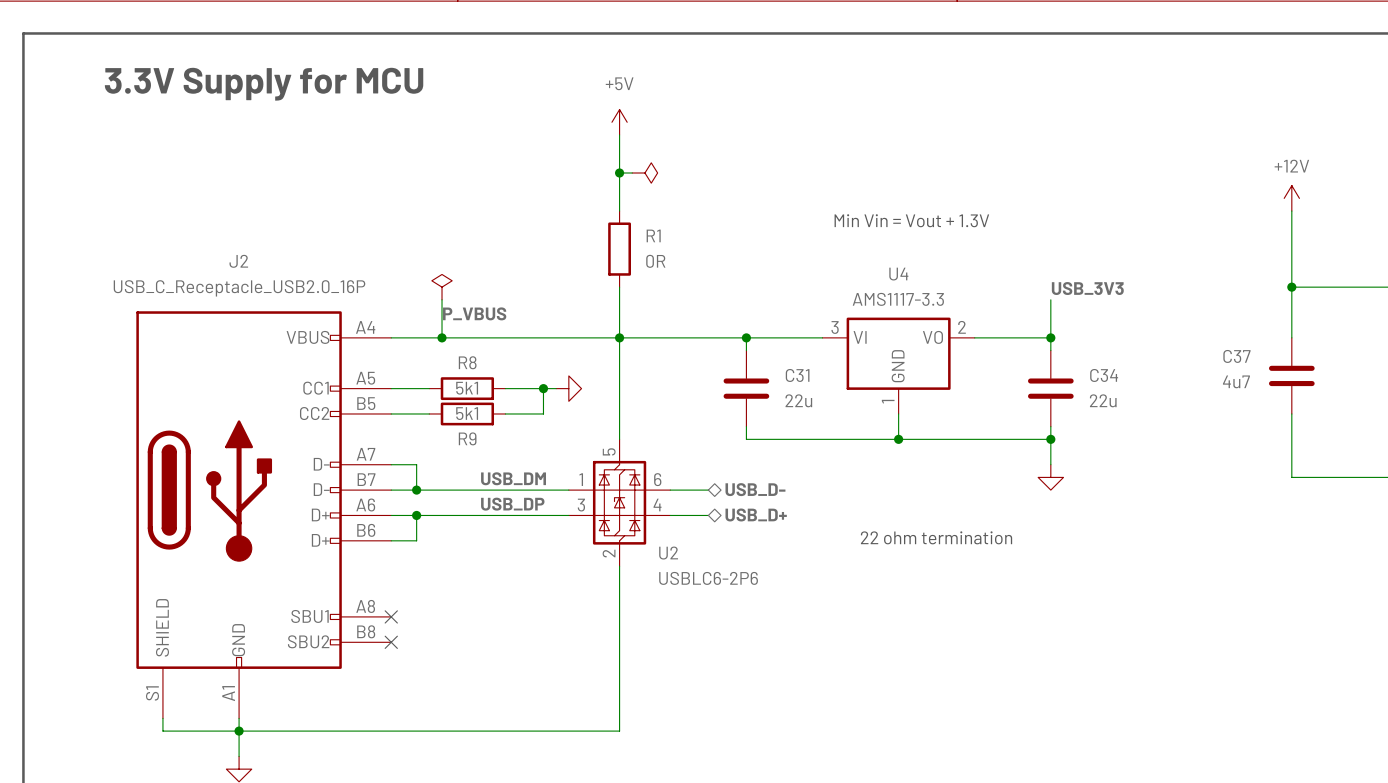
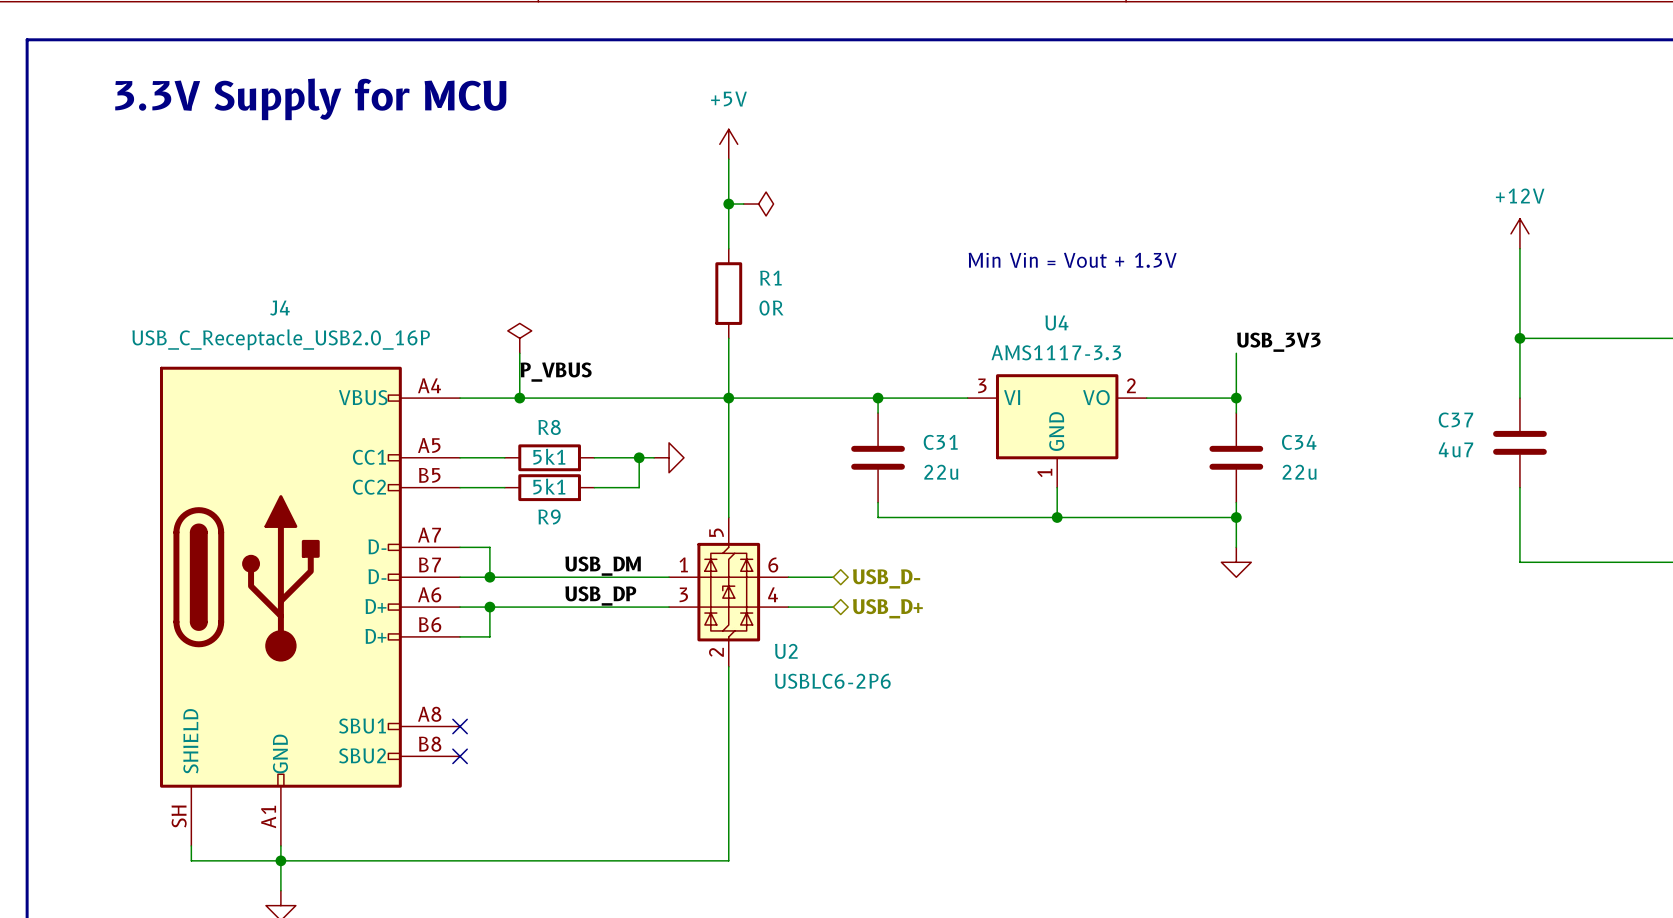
J2 name: J2 (238, 261) -> J4 (279, 308)
text: 22 ohm termination (936, 537) -> none
J2 pin number: S1 (152, 693) -> SH (179, 816)

